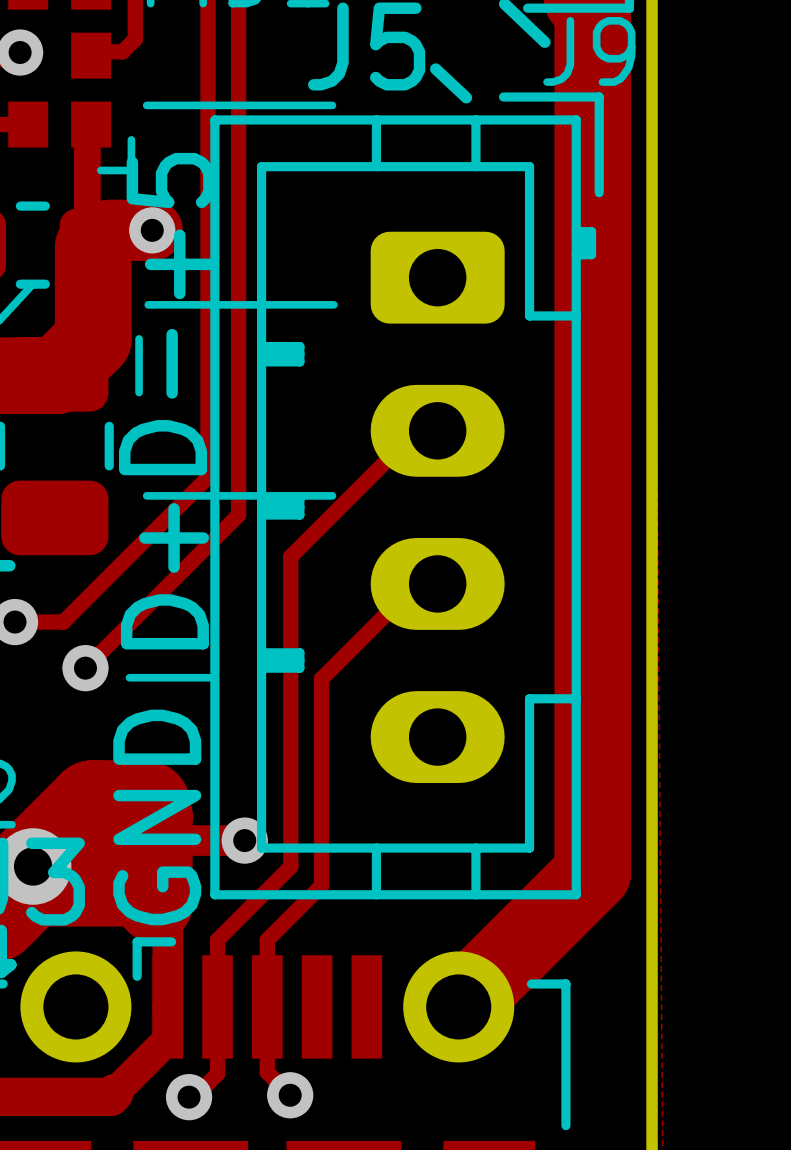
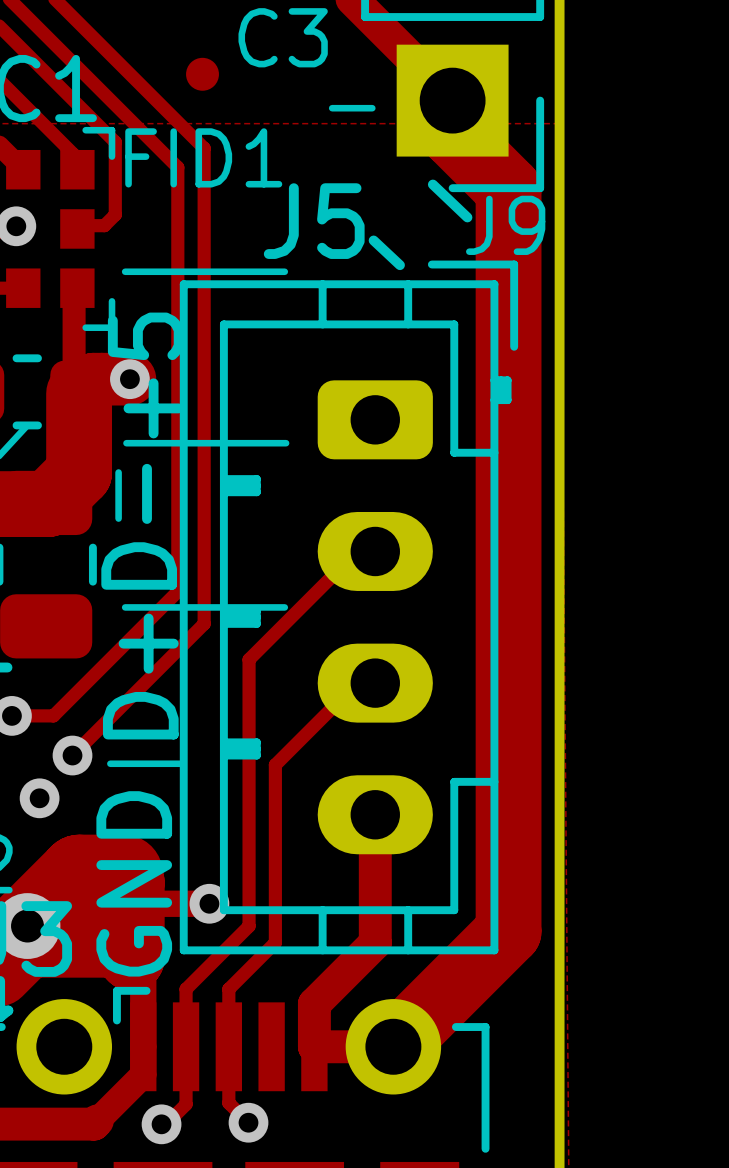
via: none -> (39, 798)
track: none -> (375, 814) (375, 943) (314, 1003) (314, 1046) (316, 1045) (317, 1046) (393, 1046)

